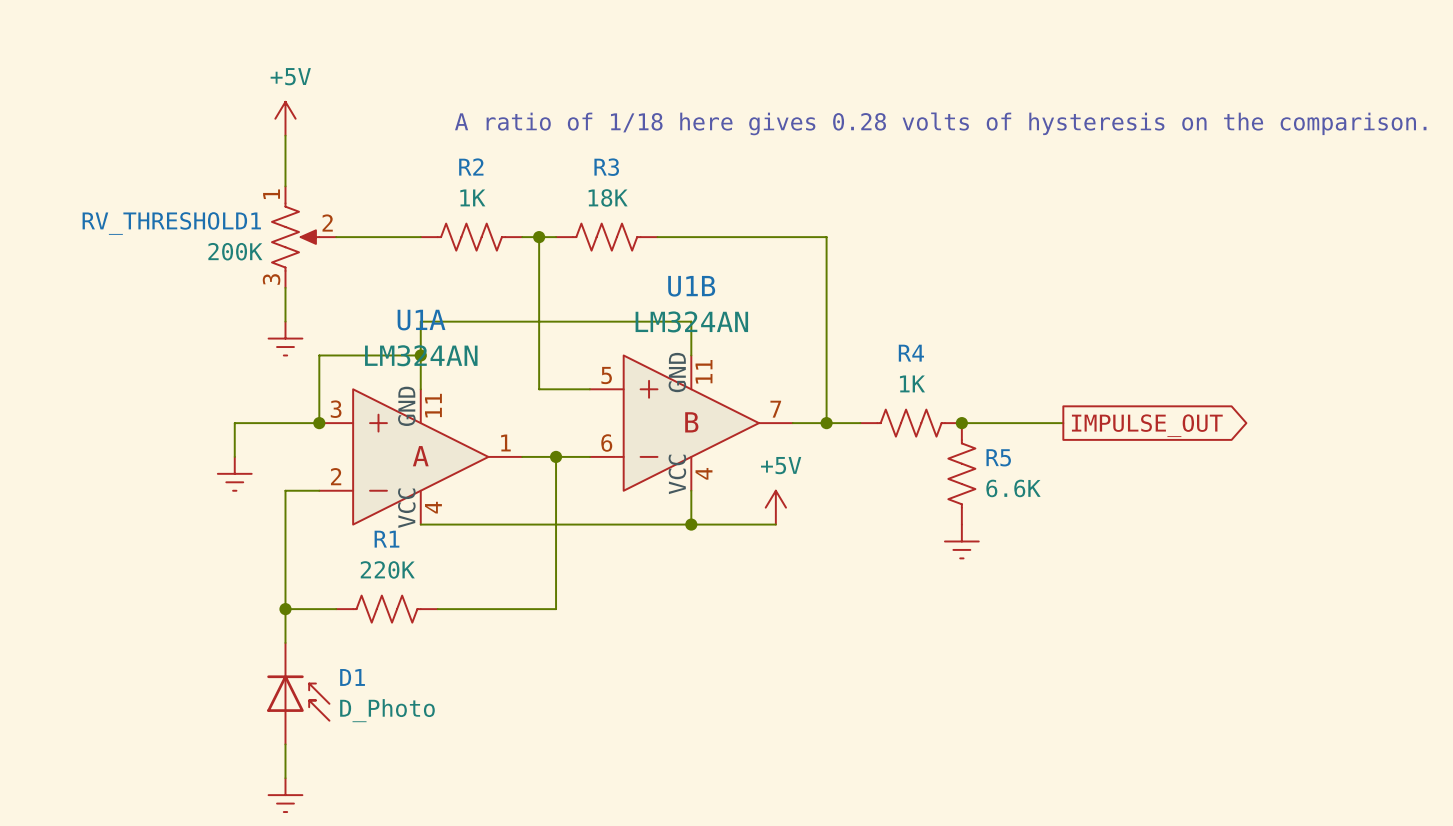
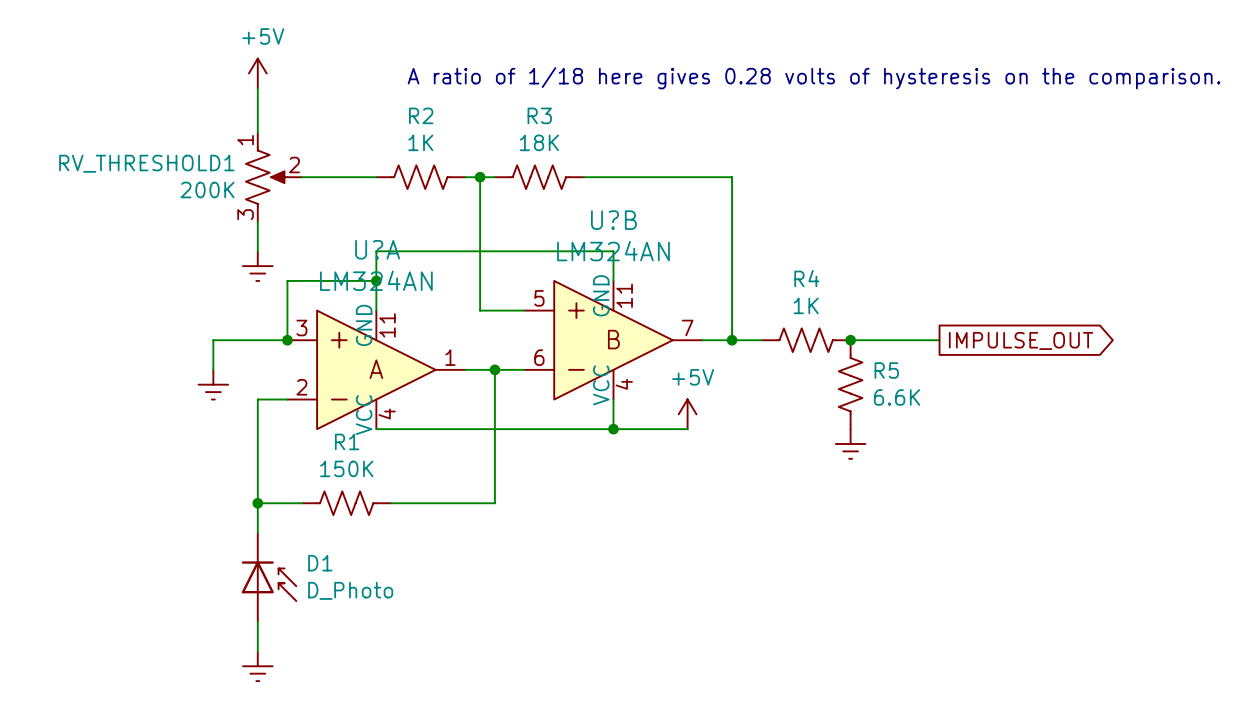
U1B name: U1B (691, 286) -> U?B (613, 220)
U1A name: U1A (421, 320) -> U?A (377, 249)
R1 value: 220K (387, 569) -> 150K (346, 468)

